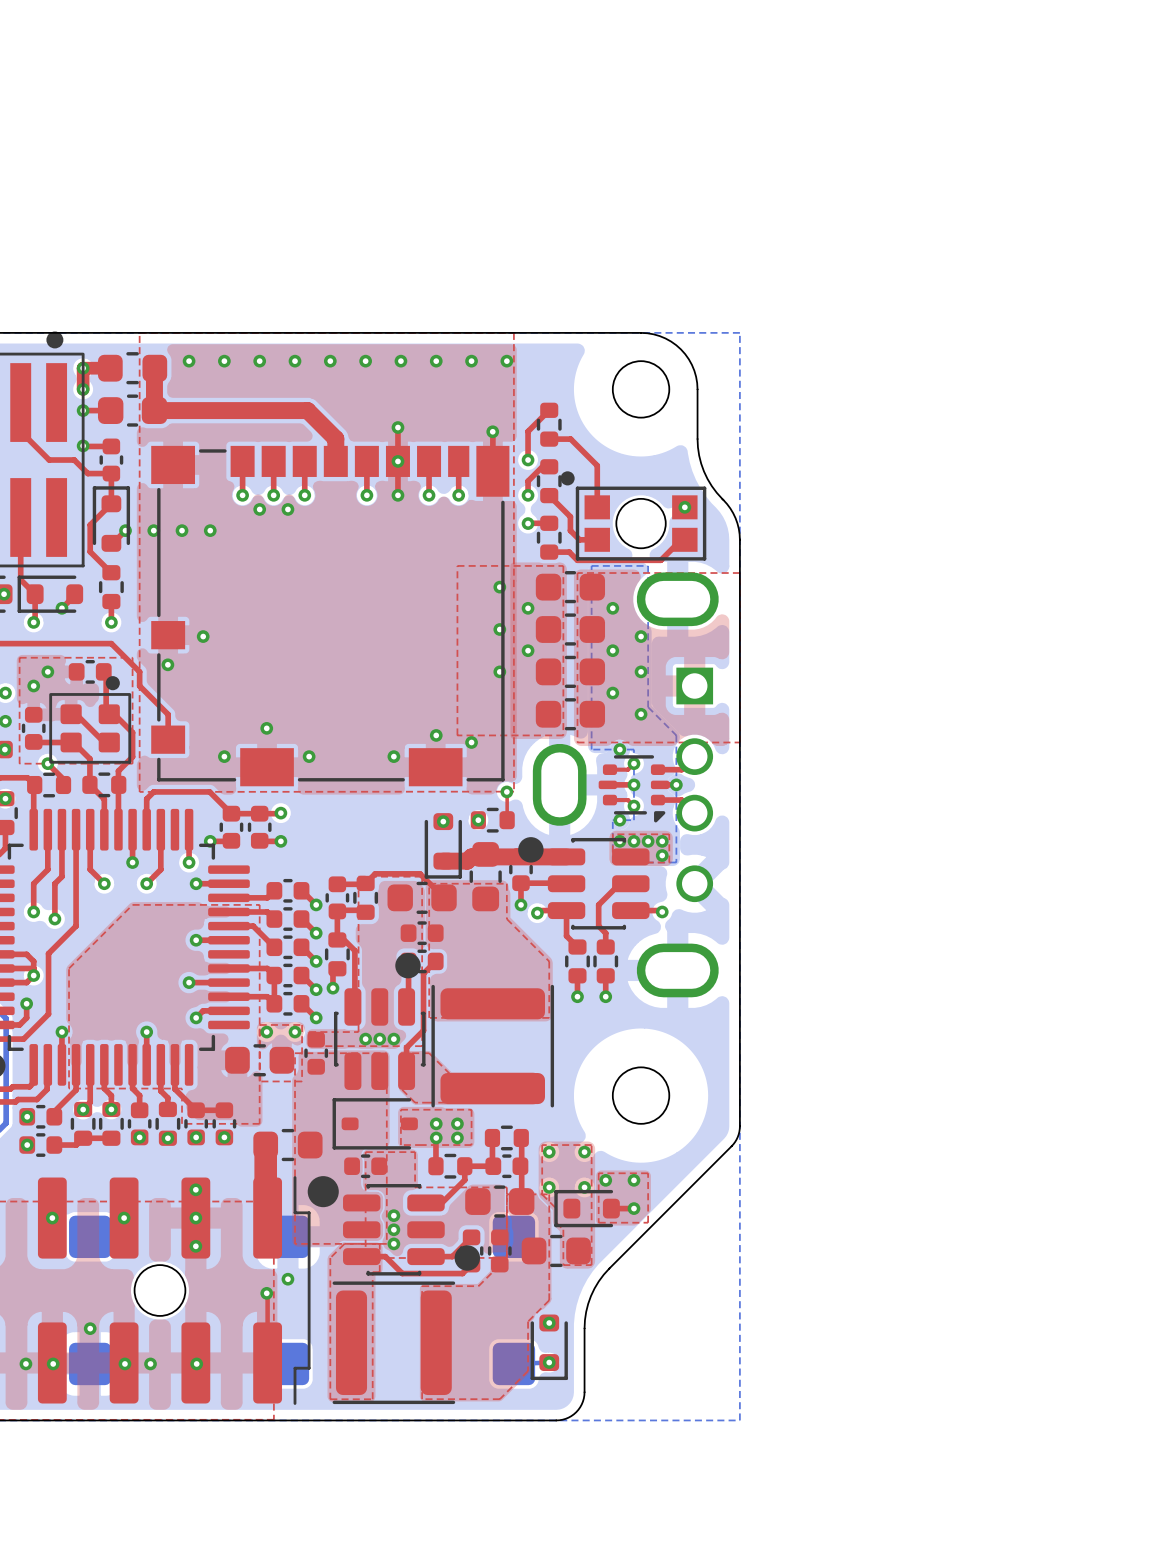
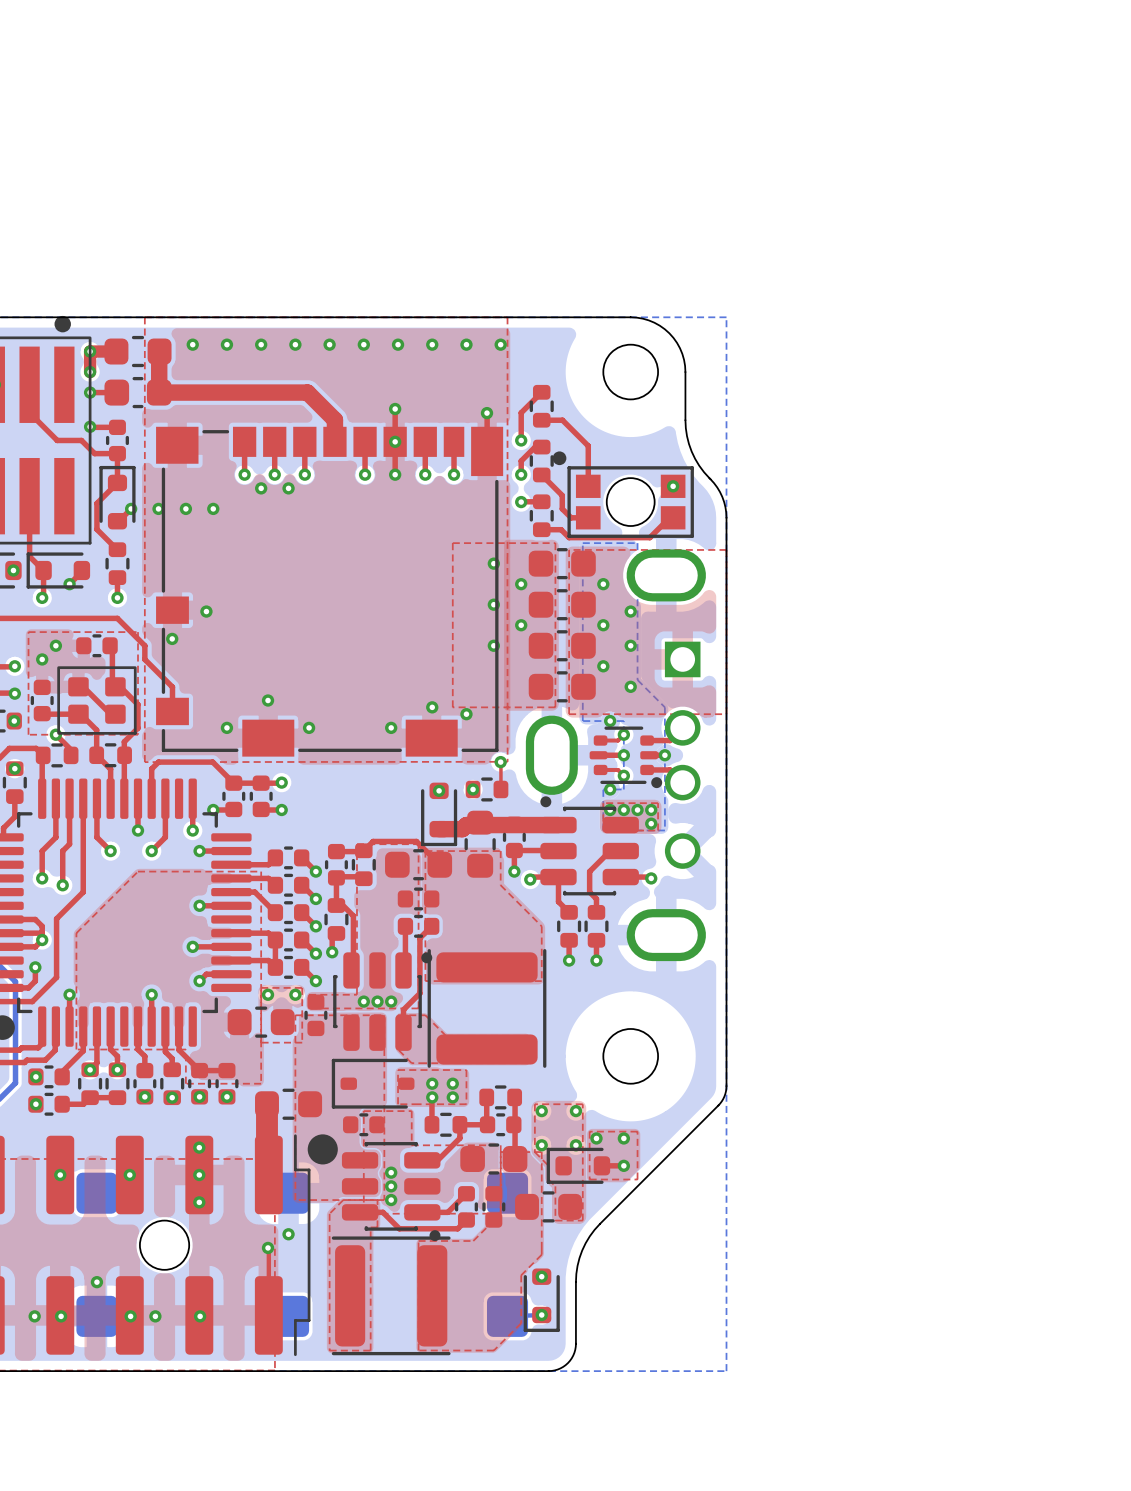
part footprint: [49, 676, 132, 764] -> [57, 666, 137, 735]
part footprint: [598, 755, 670, 823] -> [589, 726, 663, 789]
part footprint: [518, 837, 650, 930] -> [540, 796, 639, 896]
part footprint: [333, 952, 426, 1090] -> [333, 952, 433, 1051]
part footprint: [343, 1184, 481, 1276] -> [341, 1142, 441, 1242]

